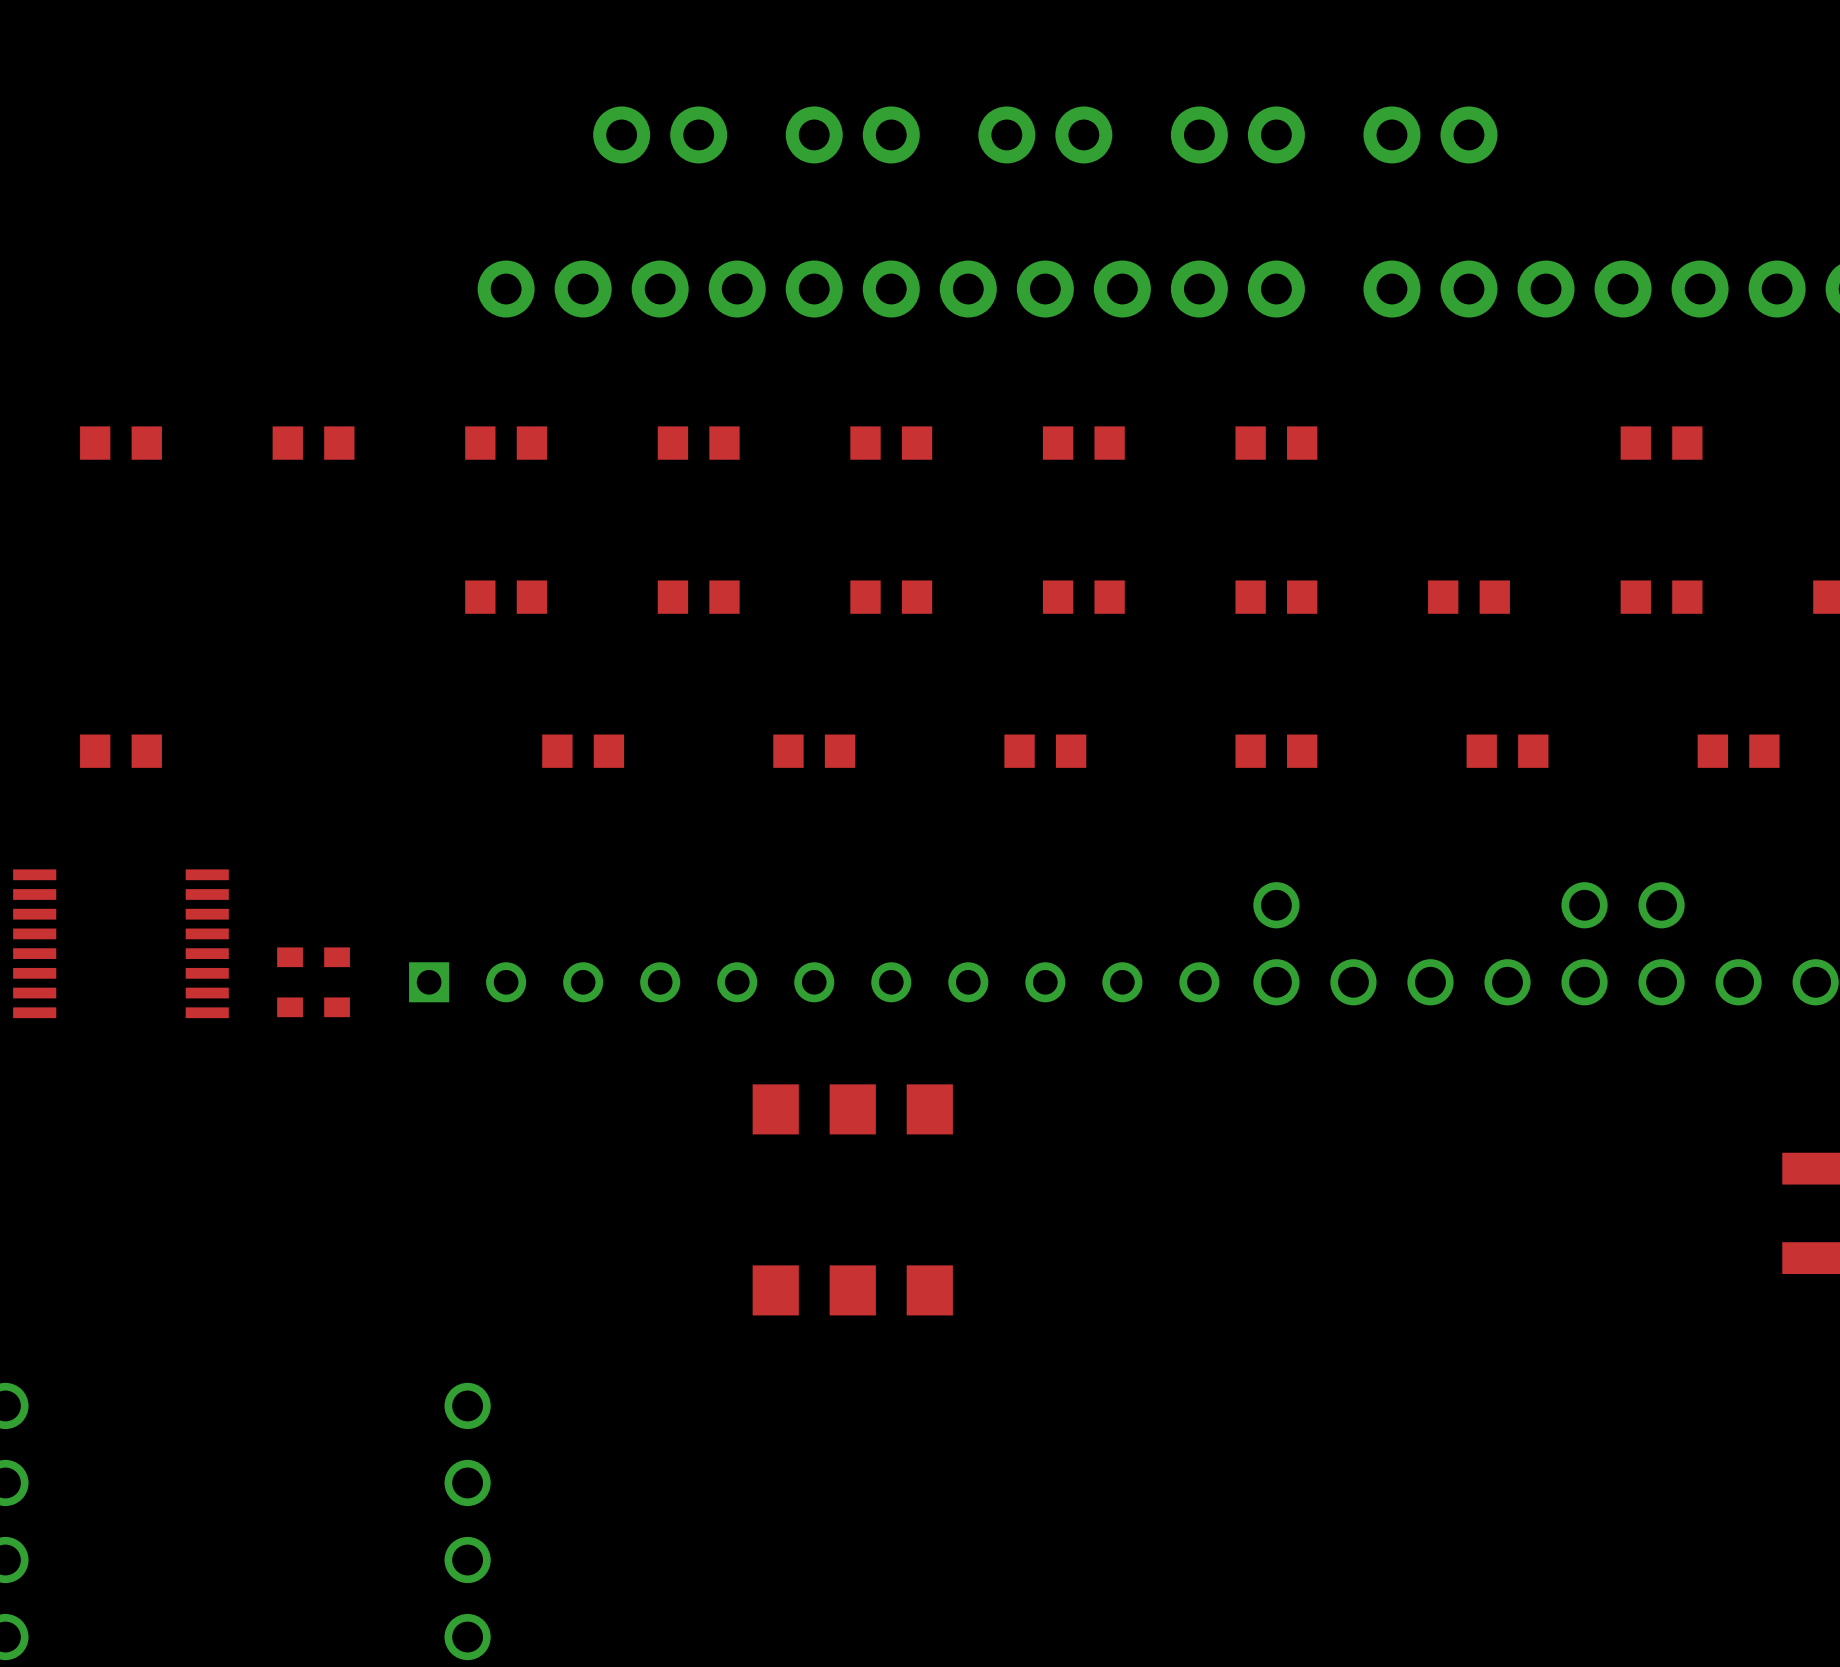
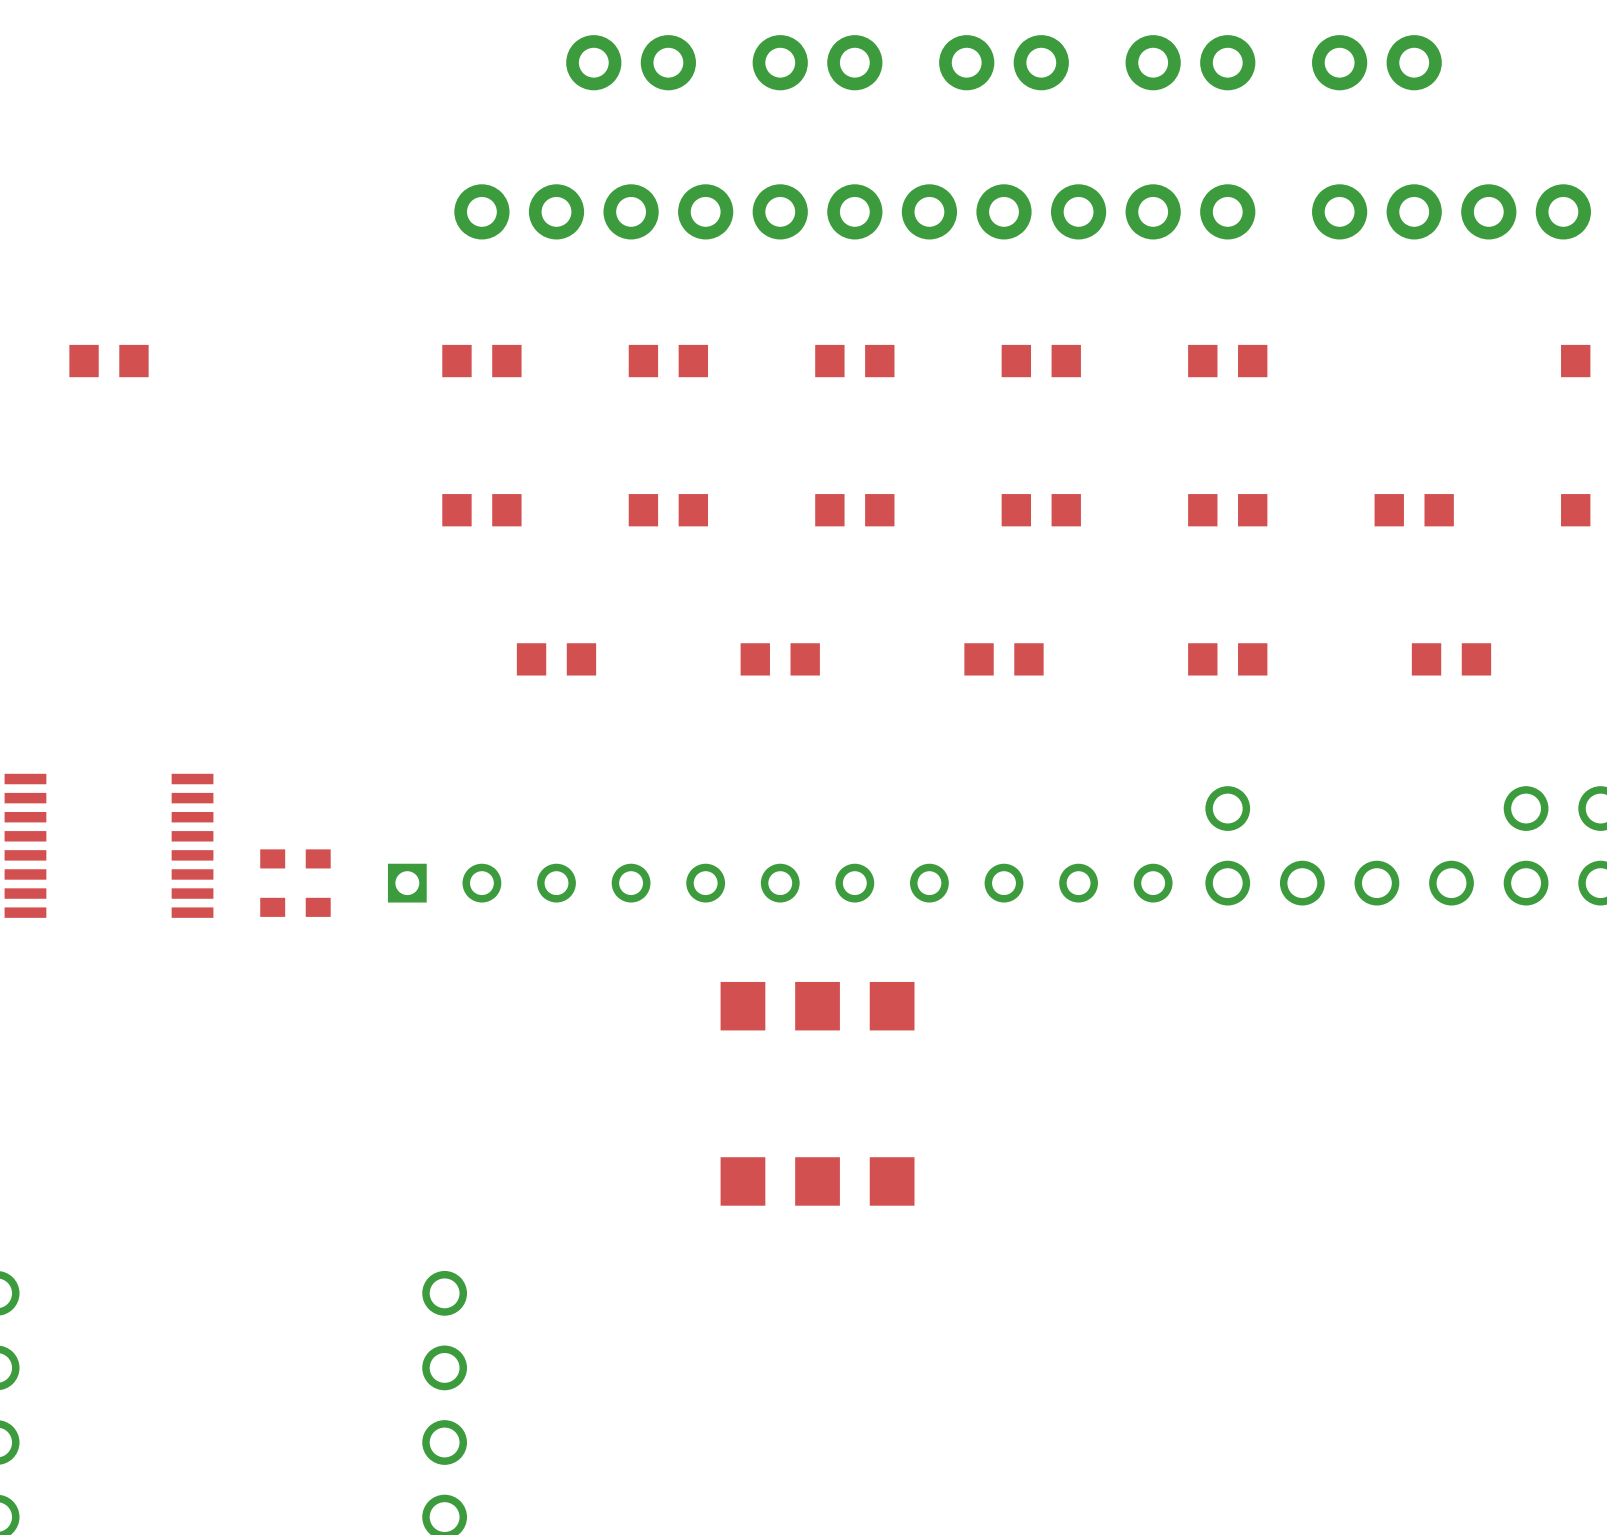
part: (313, 443) -> none
part: (120, 751) -> none

